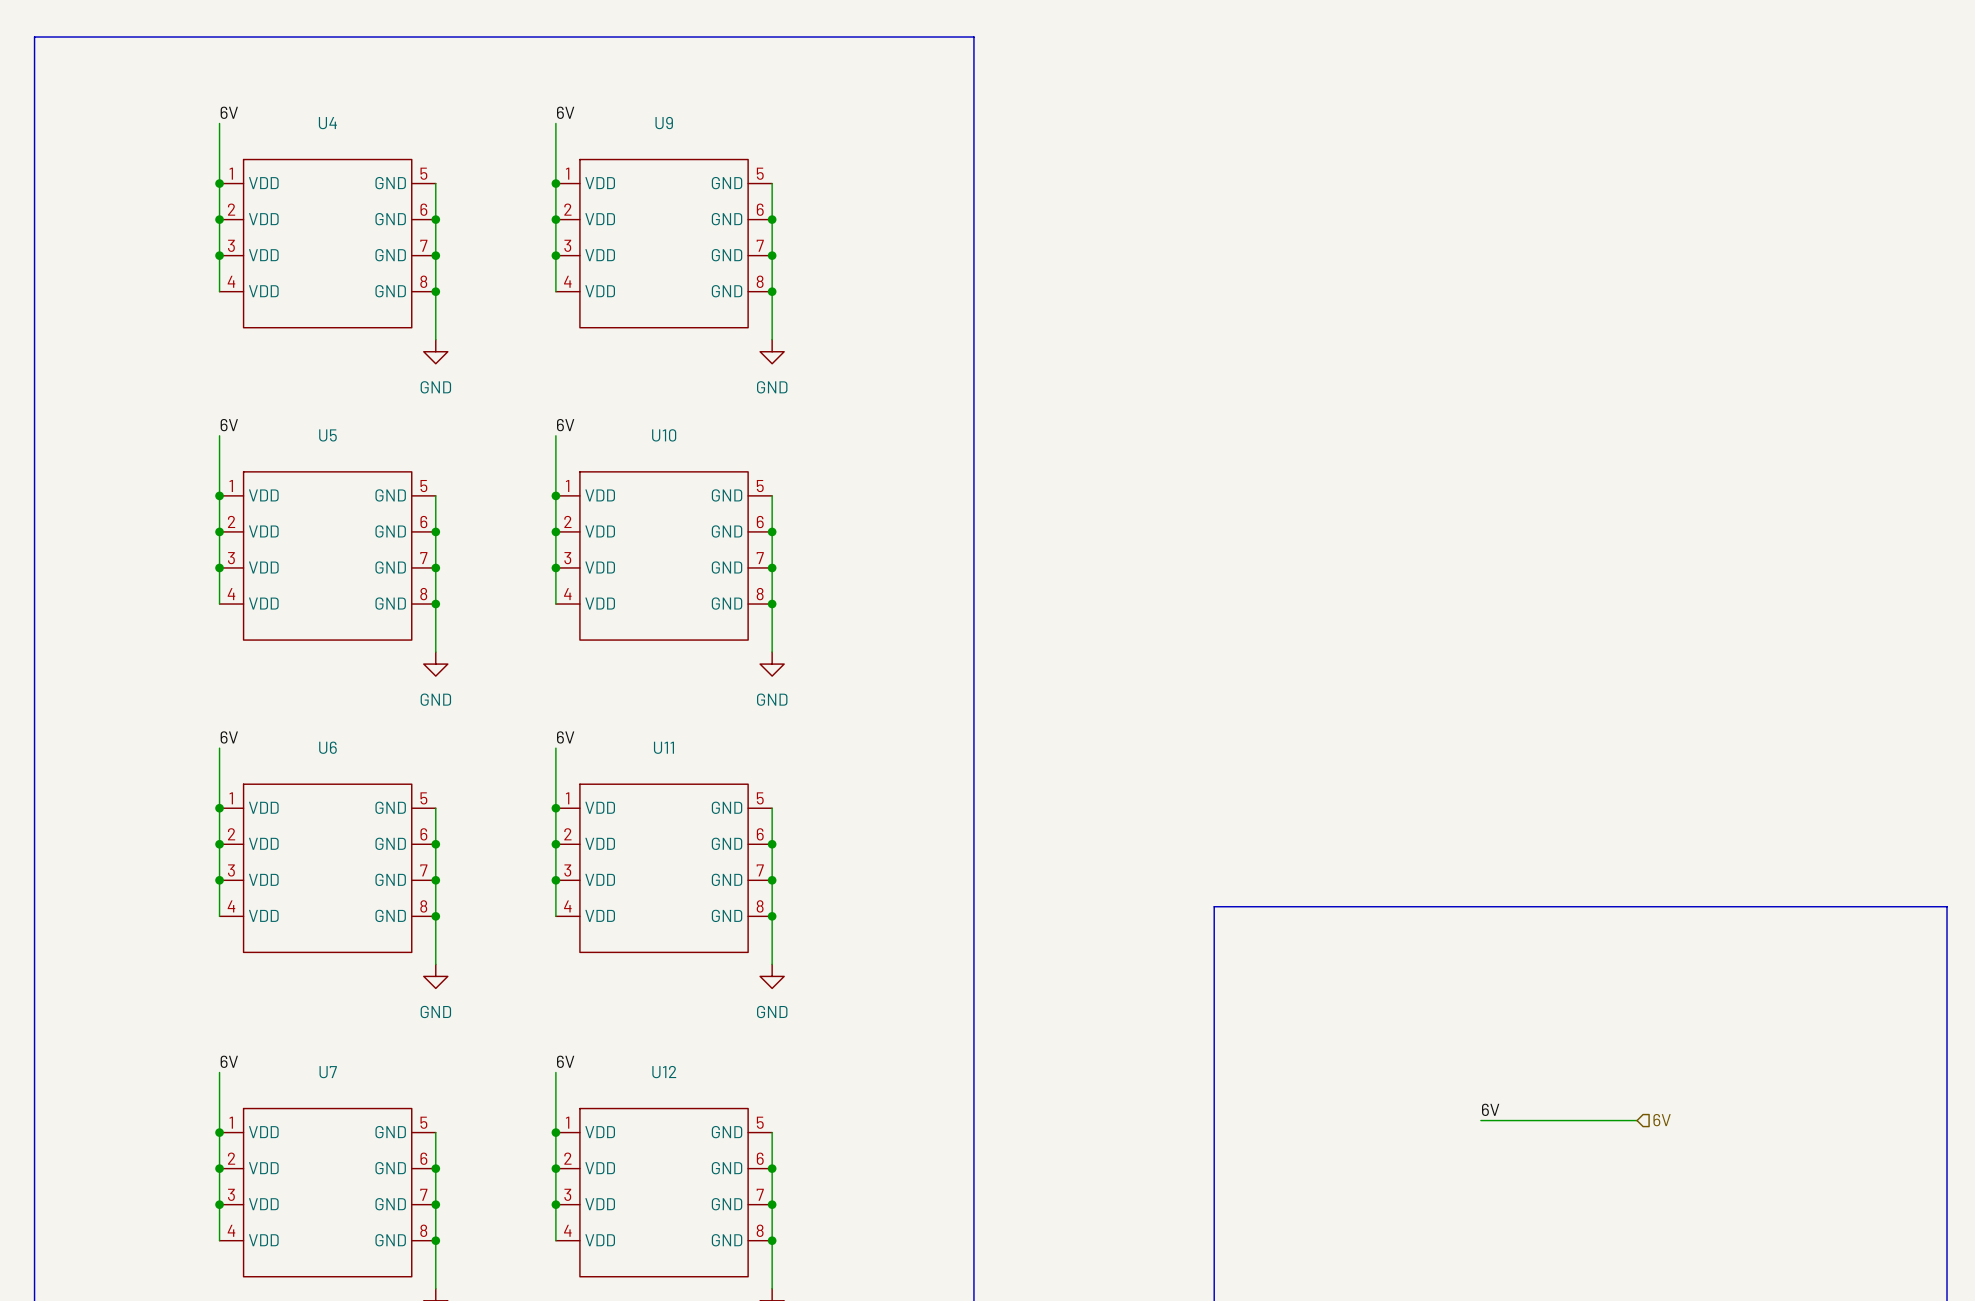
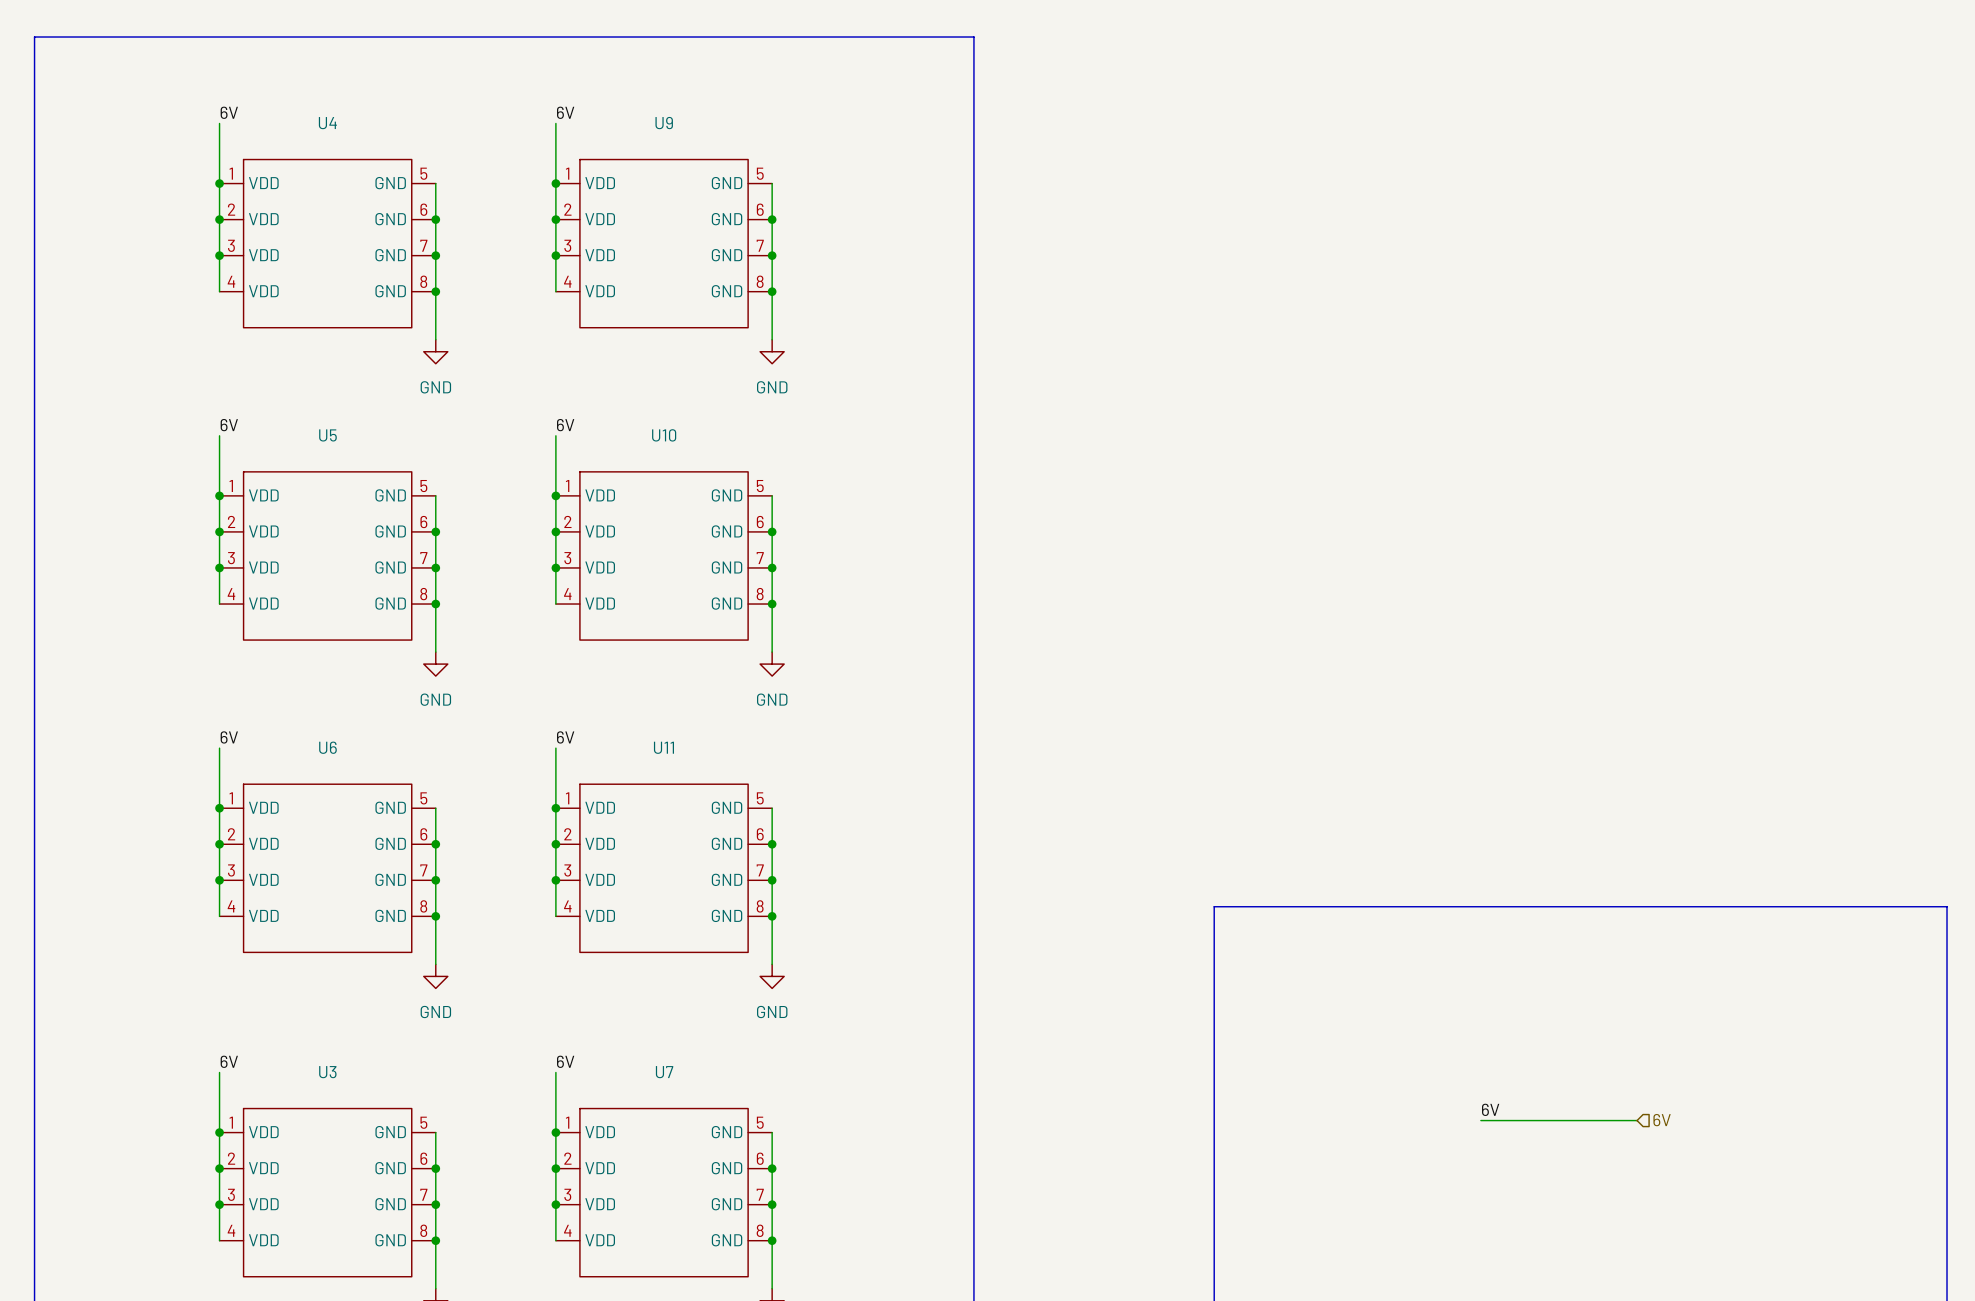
U7 name: U7 (328, 1072) -> U3 (327, 1072)
U12 name: U12 (664, 1072) -> U7 (664, 1072)

